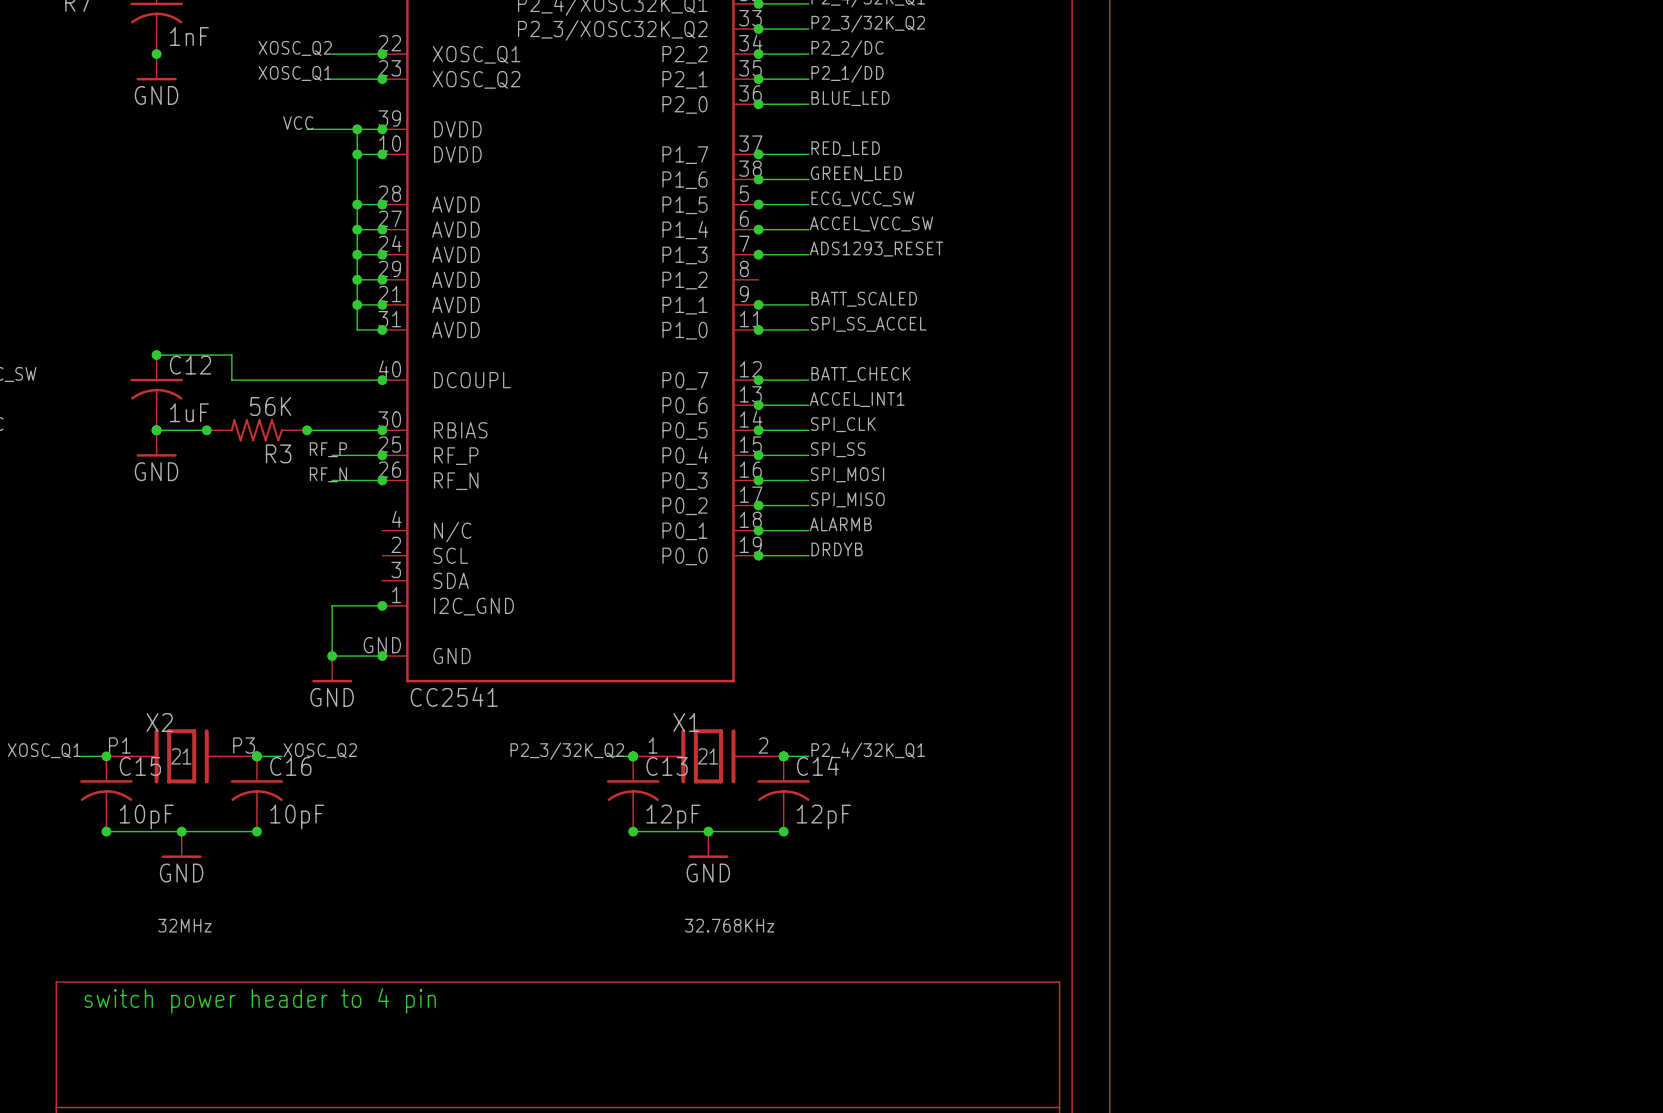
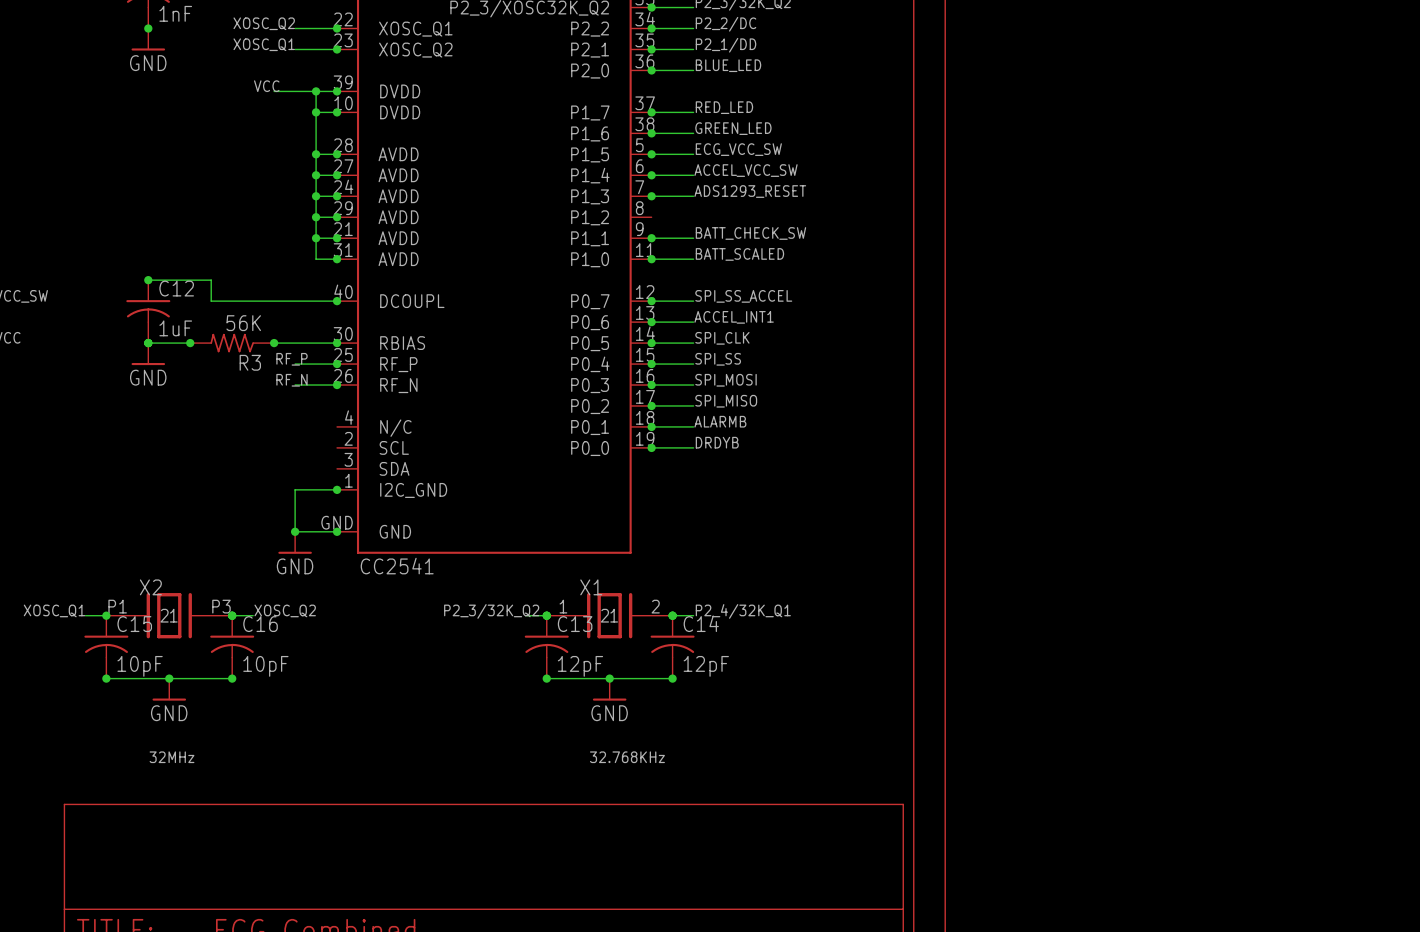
label: BATT_SCALED (864, 299) -> BATT_CHECK_SW (750, 233)
label: SPI_SS_ACCEL (868, 324) -> BATT_SCALED (739, 254)
label: BATT_CHECK (860, 374) -> SPI_SS_ACCEL (743, 296)
text: switch power header to 4 pin (260, 1000) -> none

